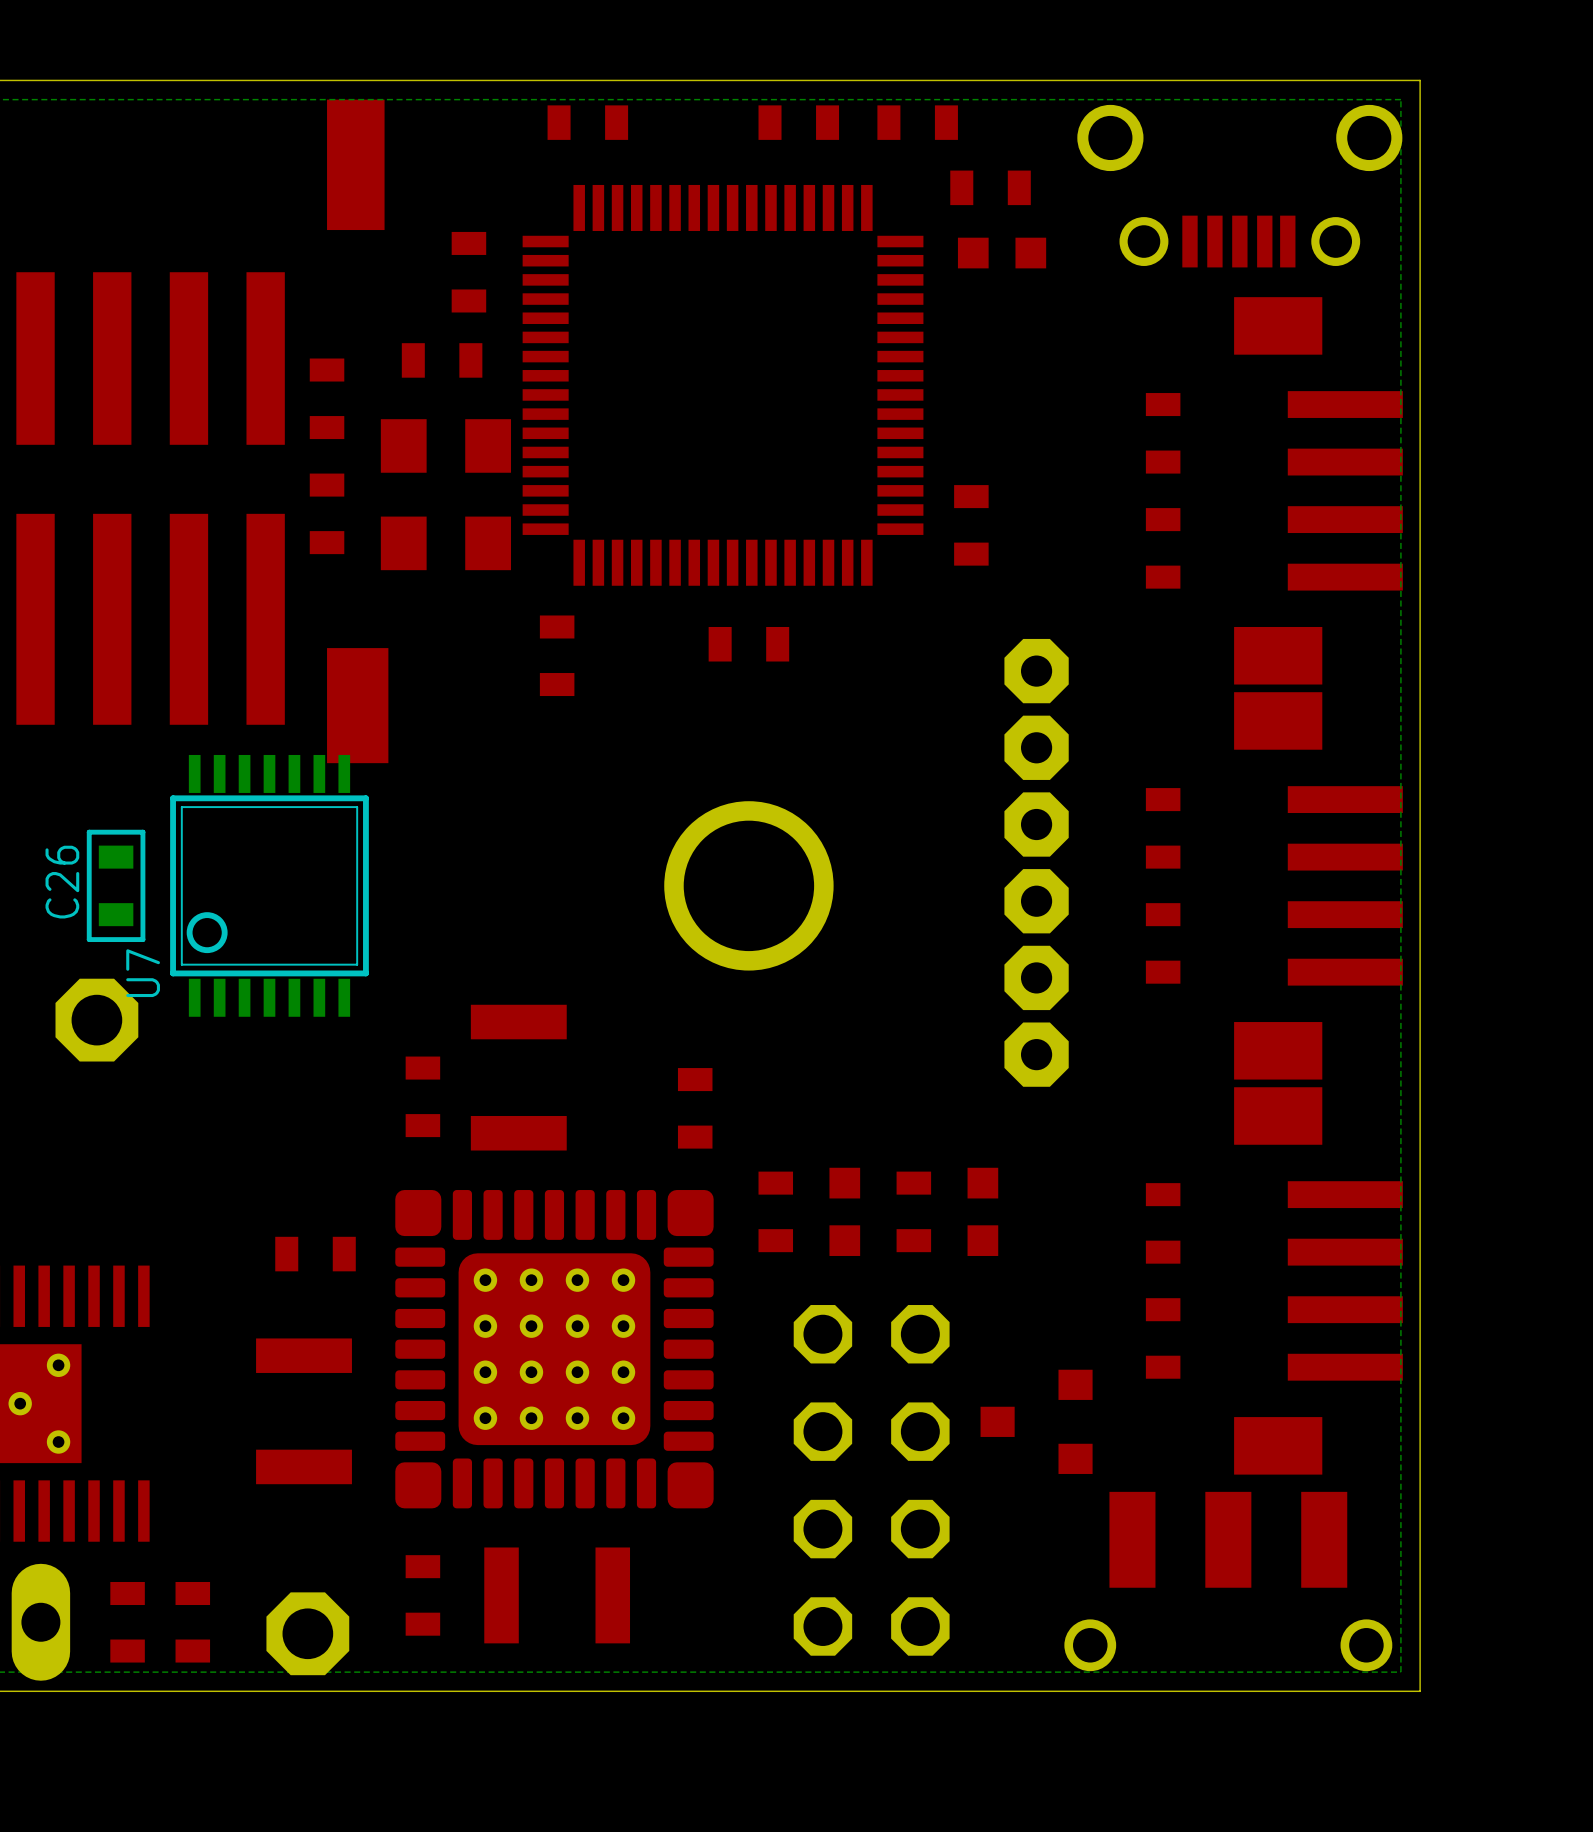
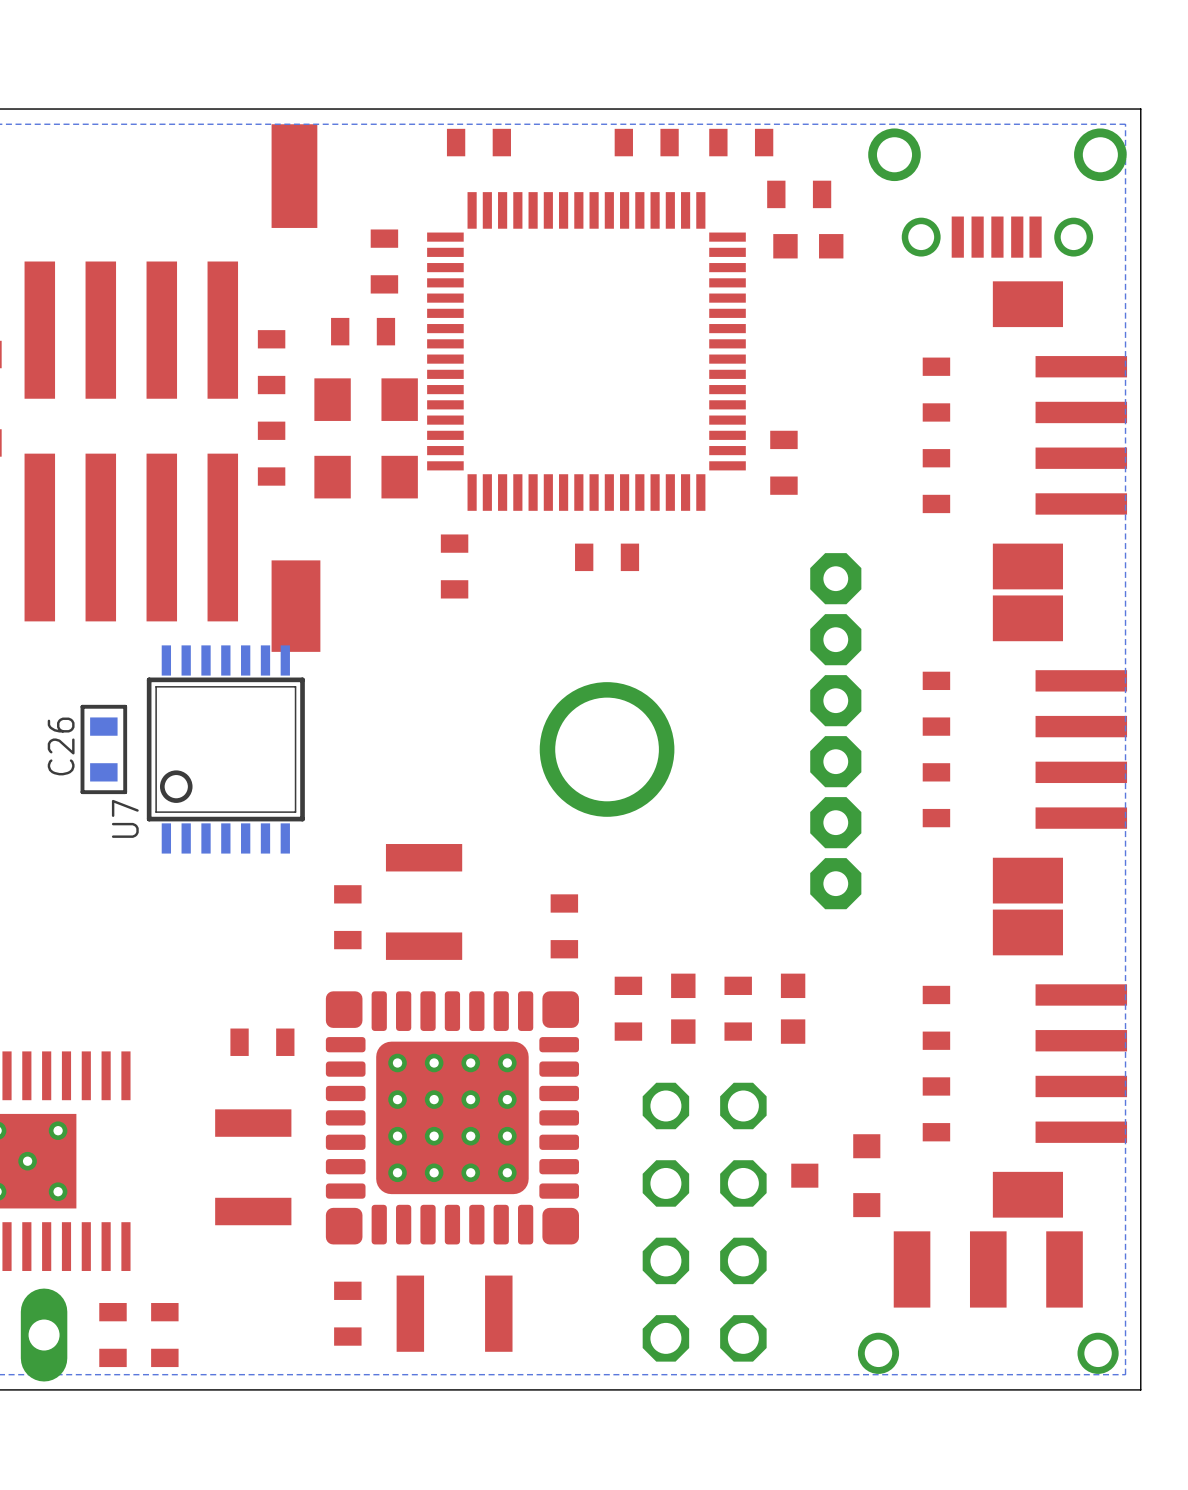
part: (96, 1020) -> none
part: (307, 1633) -> none

